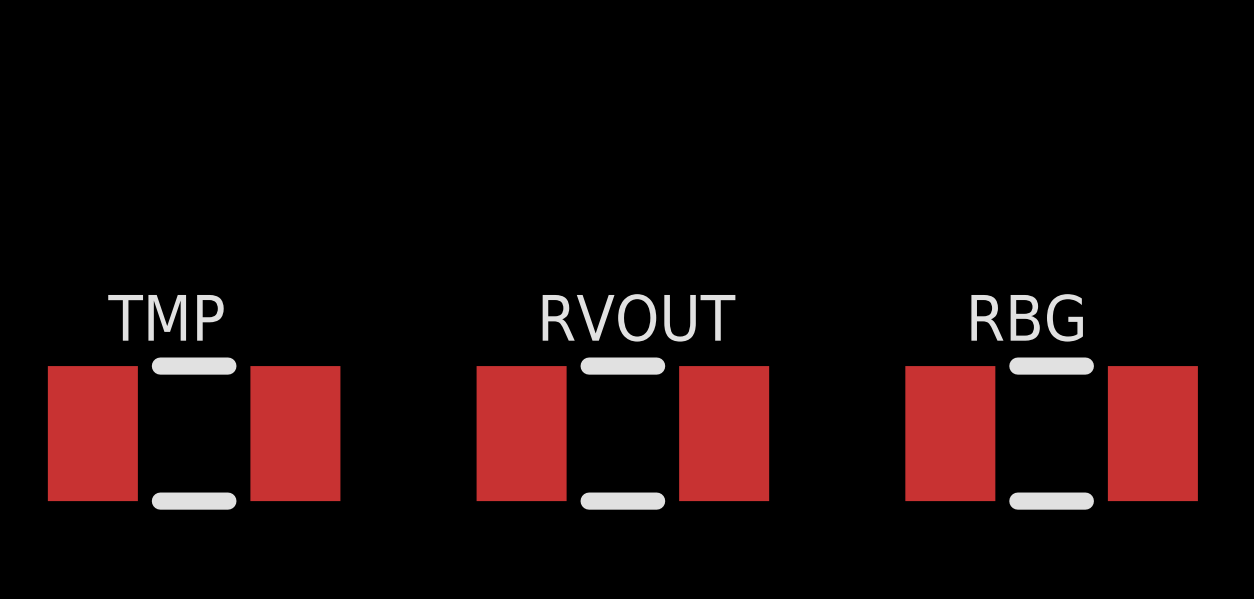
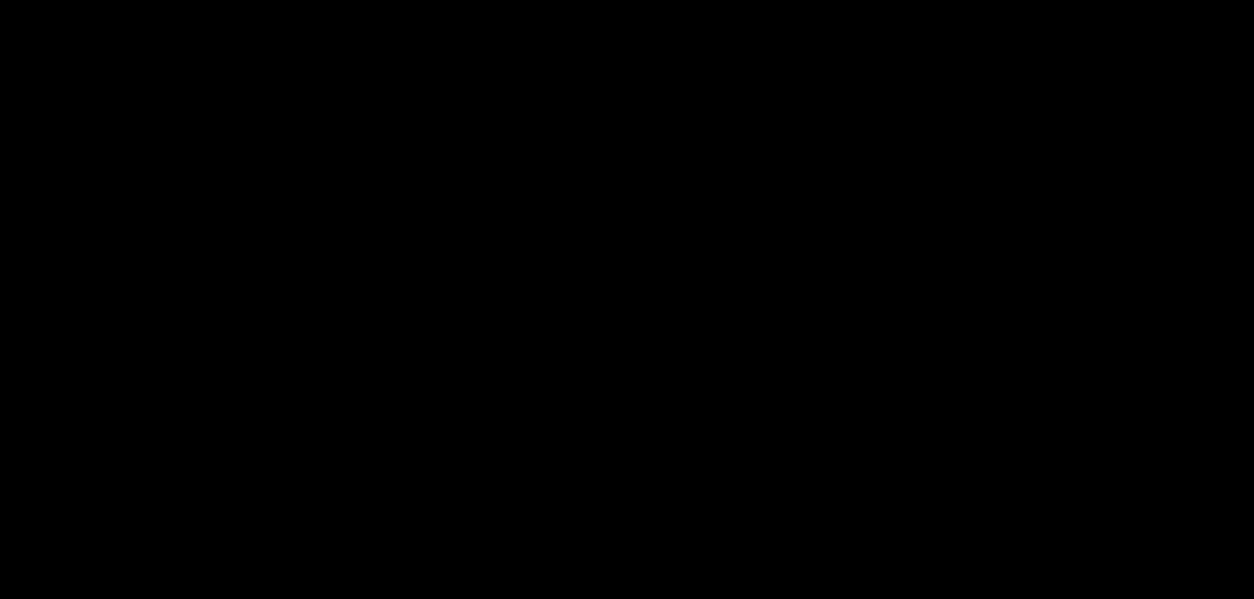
TMP: (194, 433) -> none
RVOUT: (622, 433) -> none
RBG: (1051, 433) -> none

